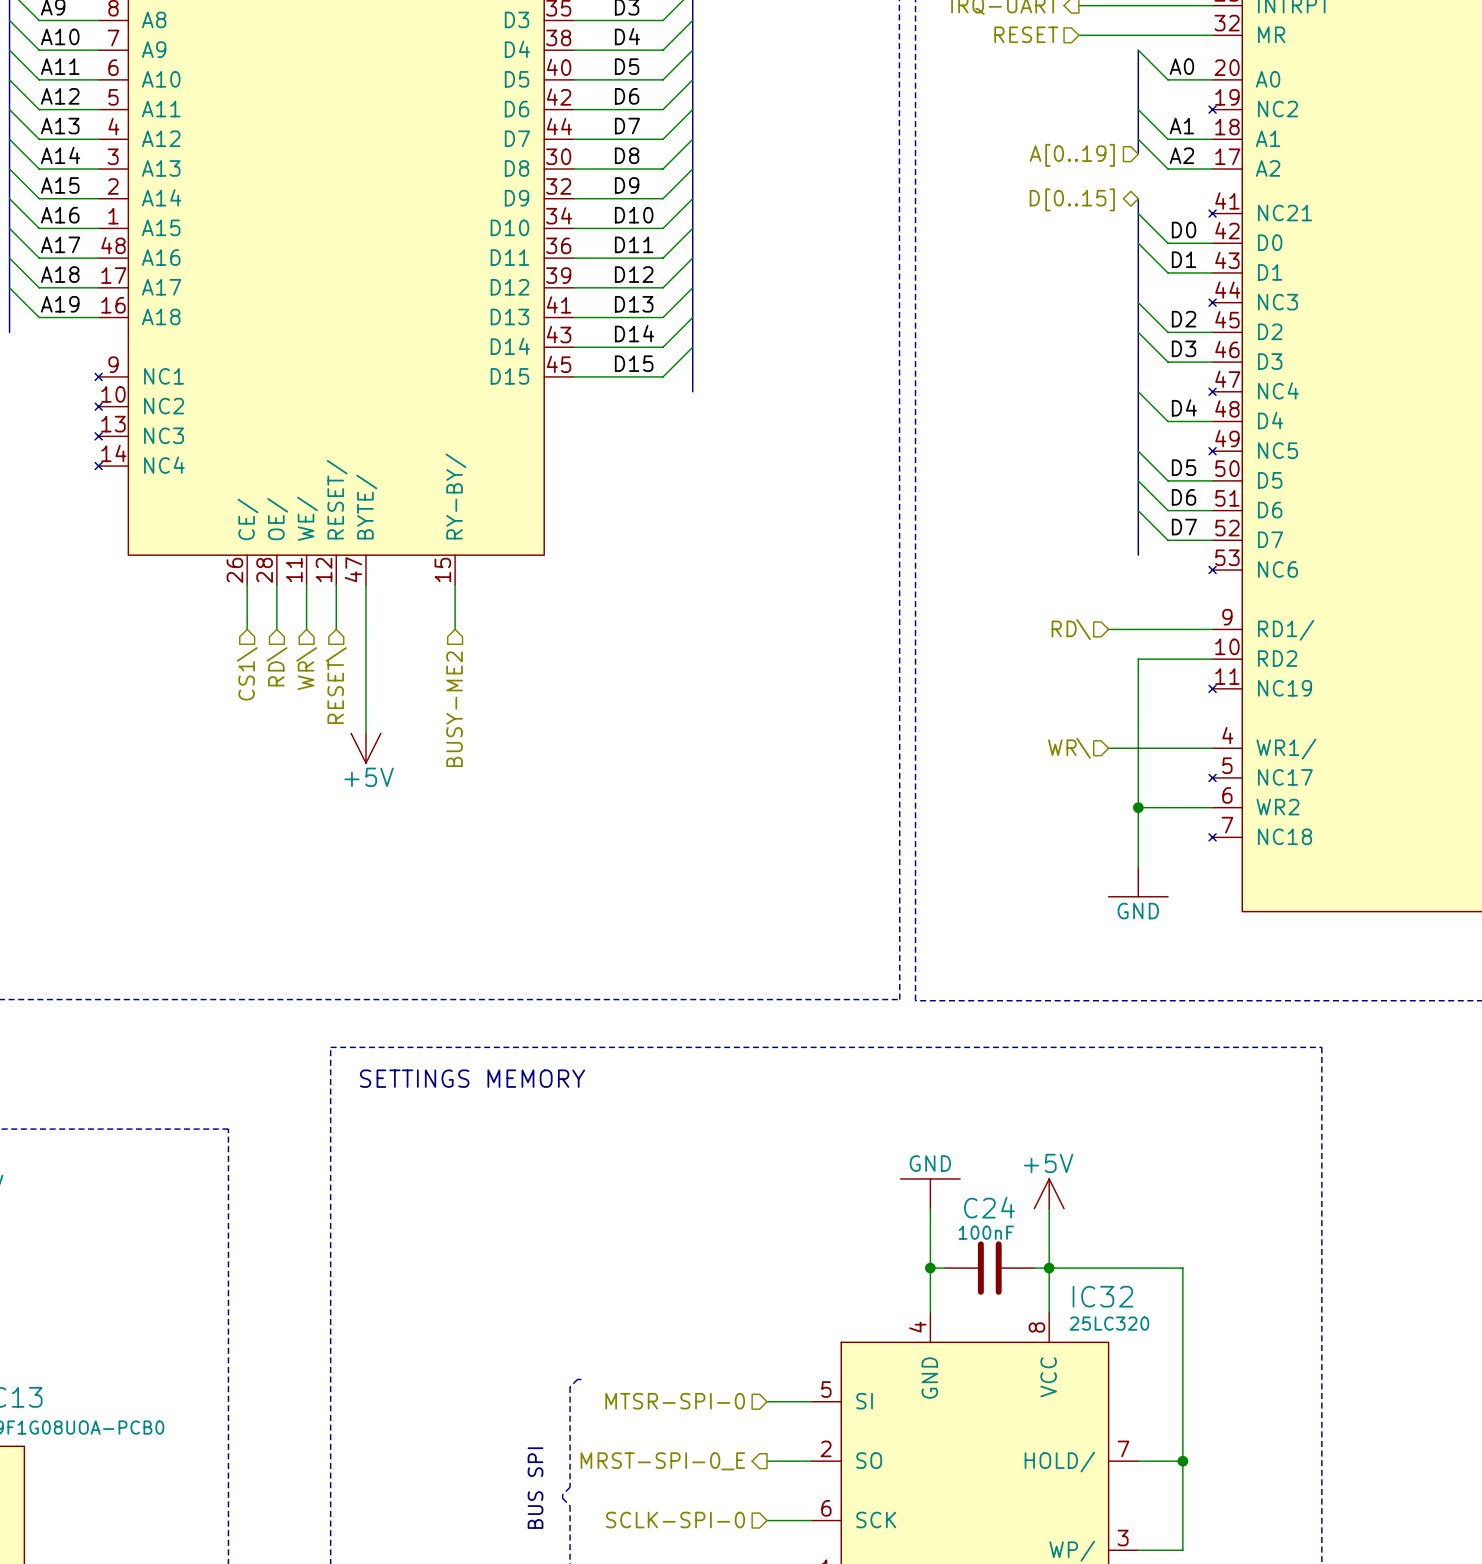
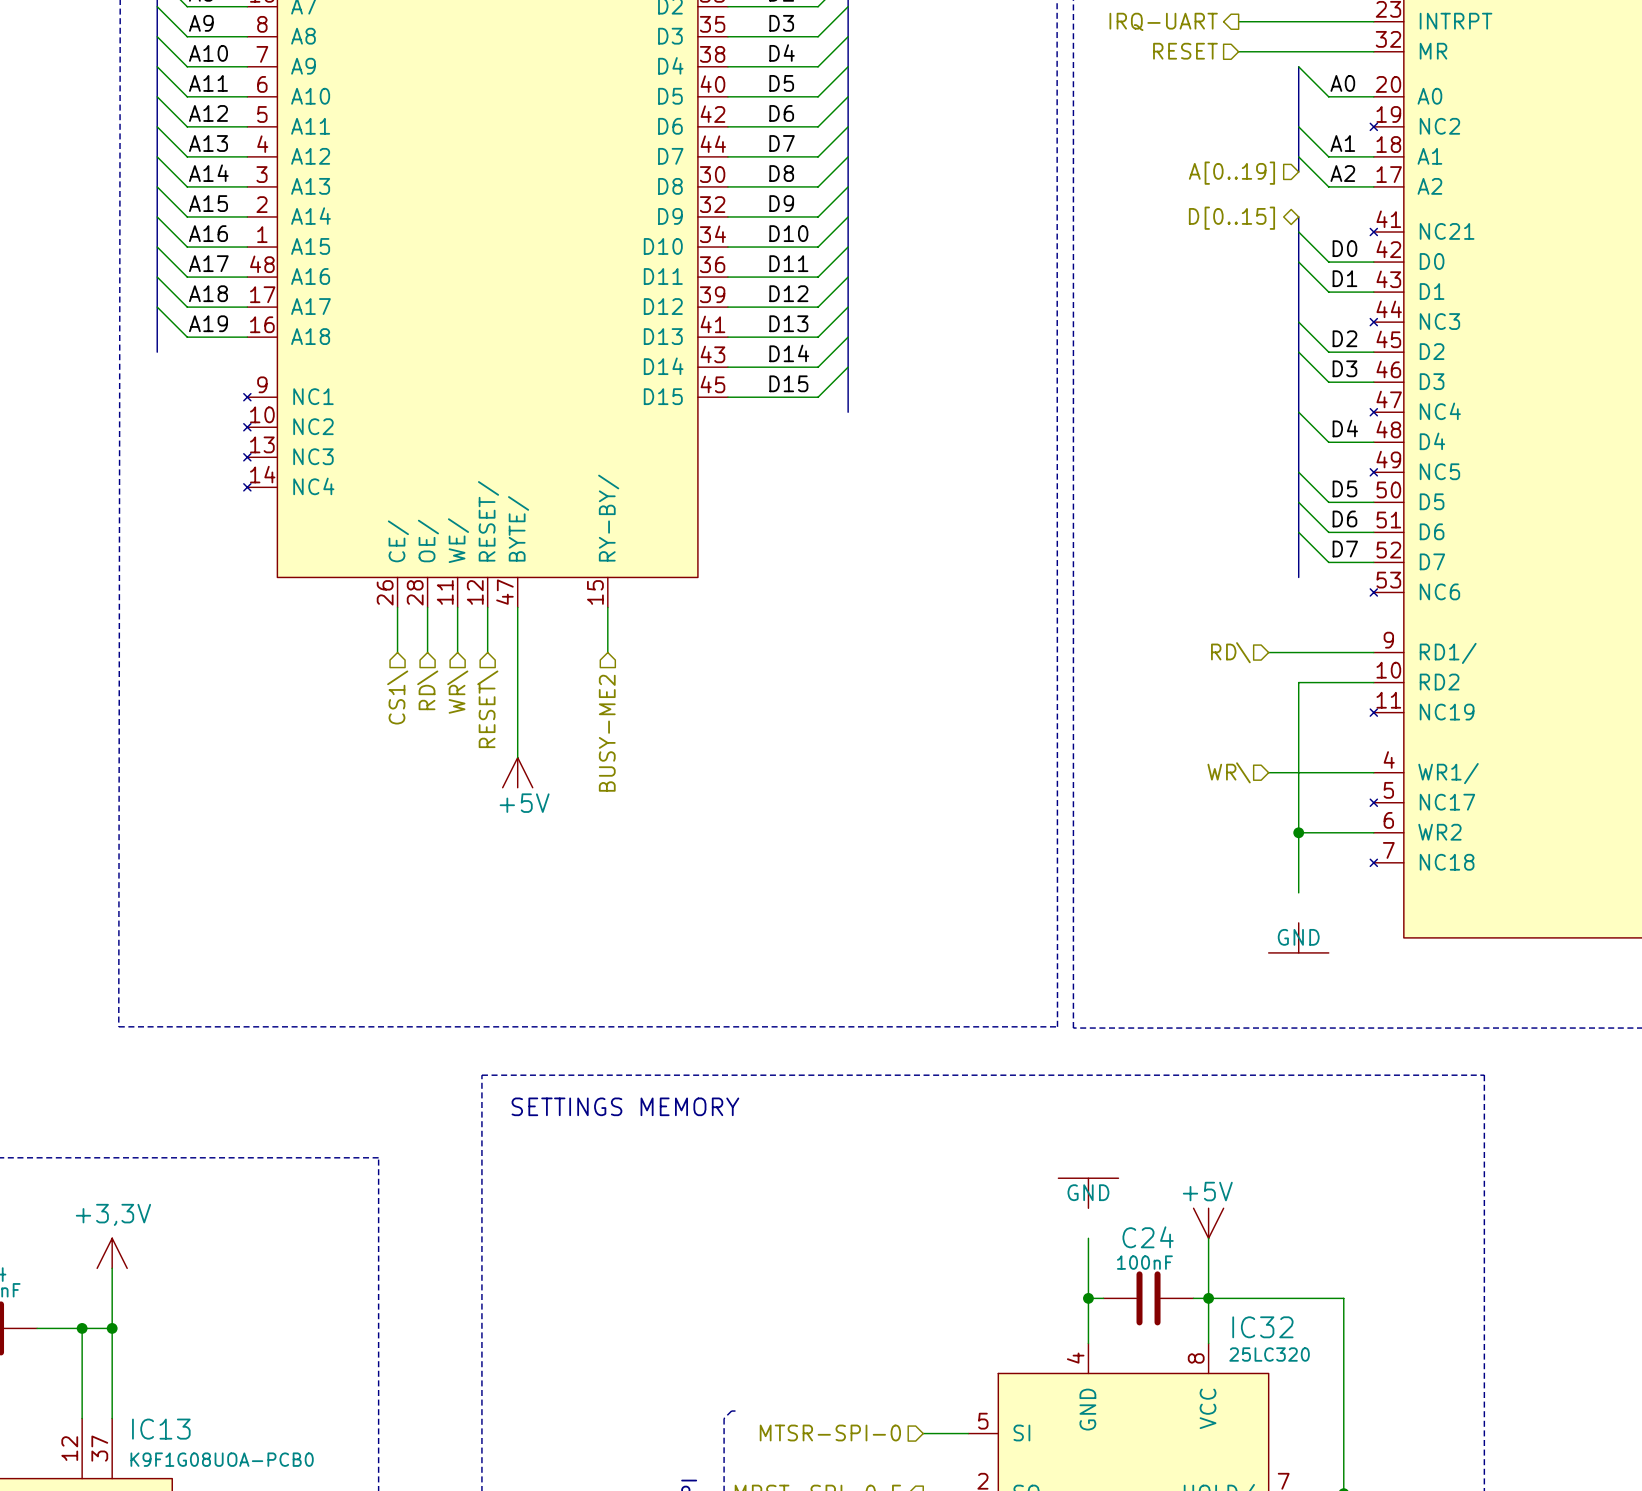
power symbol rotation: 0° (365, 748) -> 180° (517, 772)
power symbol position: GND (1138, 881) -> GND (1298, 937)
power symbol position: GND (930, 1193) -> GND (1088, 1193)
power symbol rotation: 0° (1049, 1193) -> 180° (1208, 1223)

